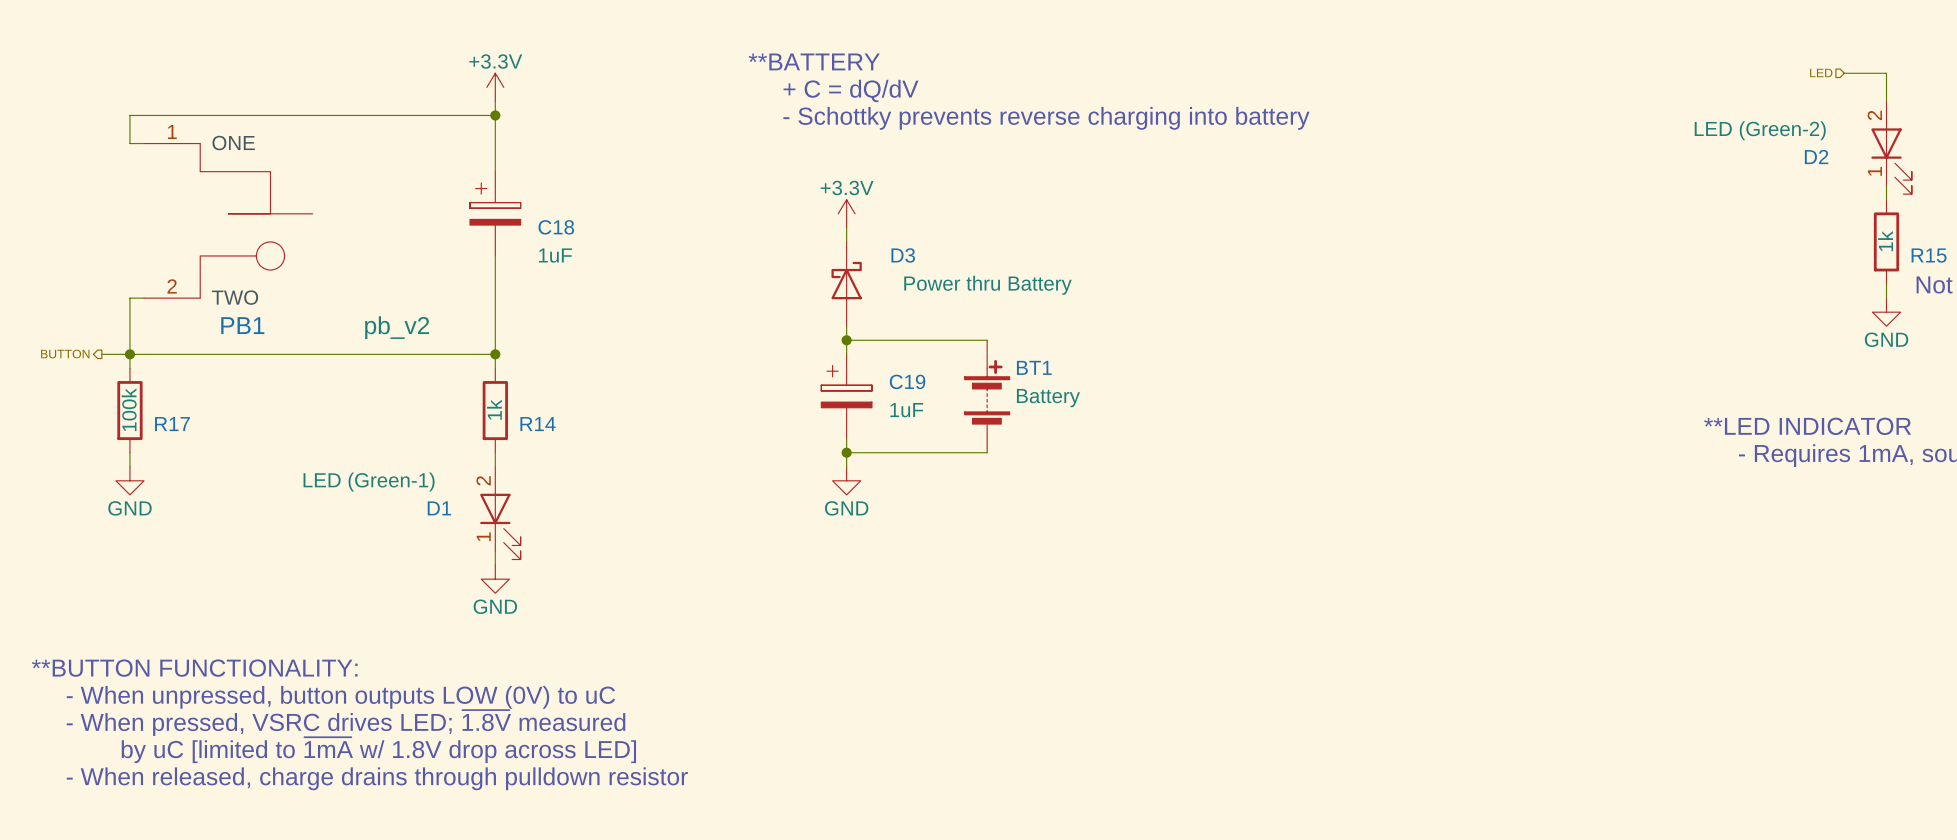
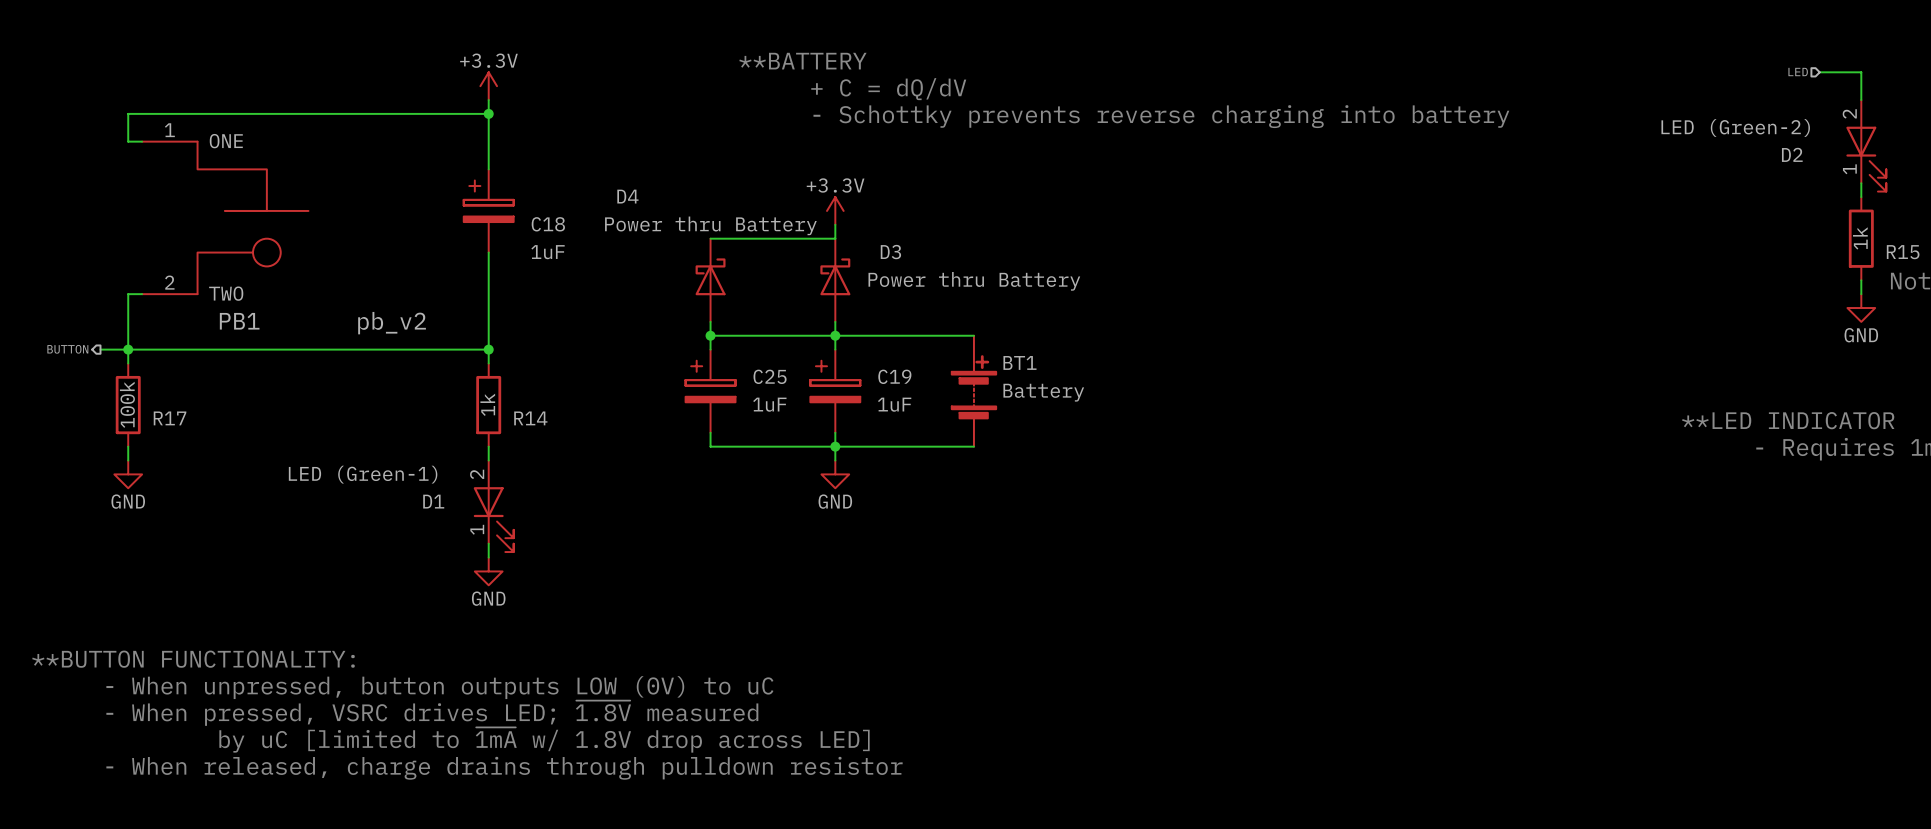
wire: none -> (710, 238) (835, 238)
D4: none -> Power thru Battery (710, 280)
wire: none -> (710, 321) (710, 349)
wire: none -> (710, 335) (835, 335)
junction: none -> (710, 335)
C25: none -> 1uF (710, 391)
wire: none -> (710, 432) (710, 446) (835, 446)

